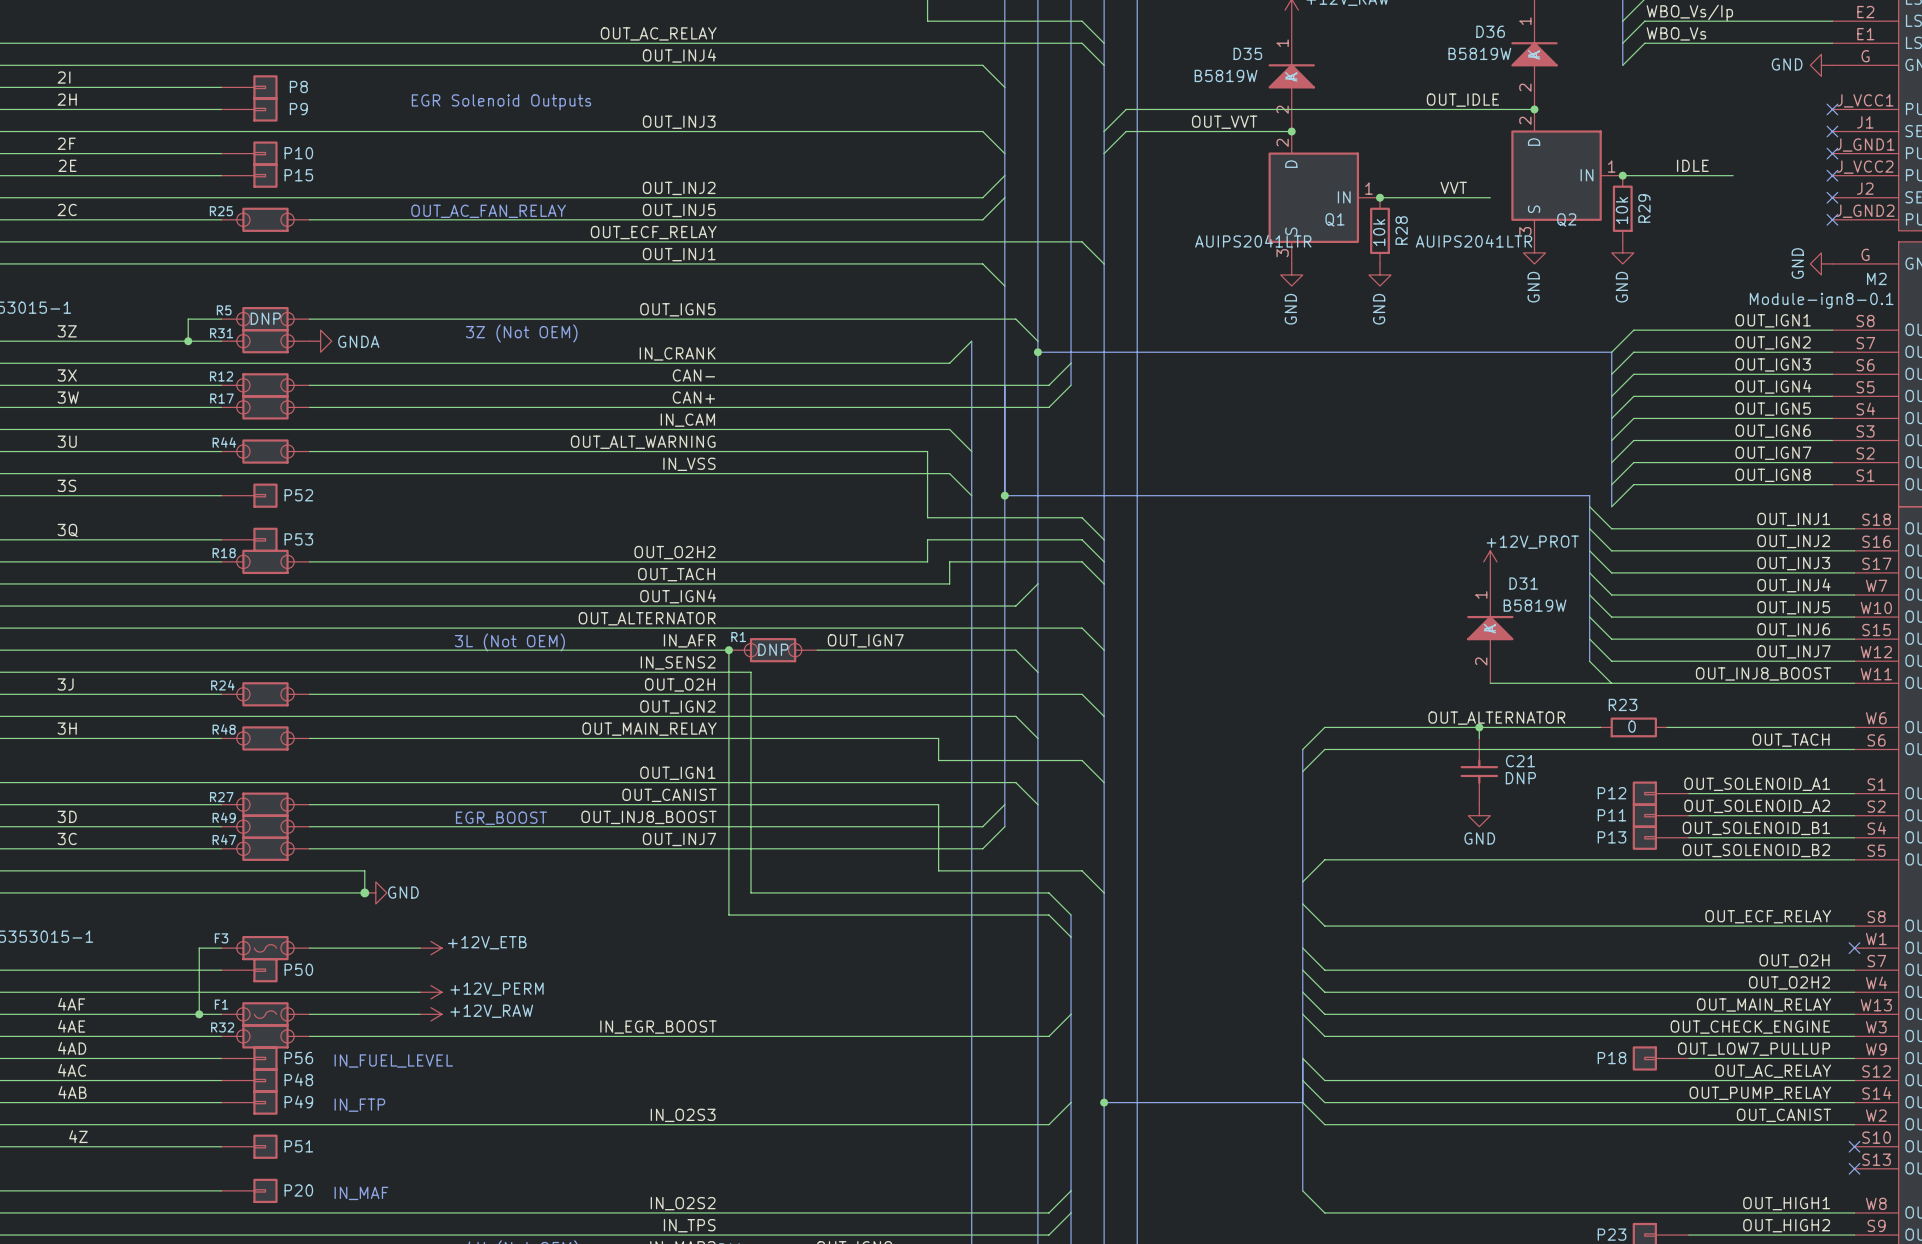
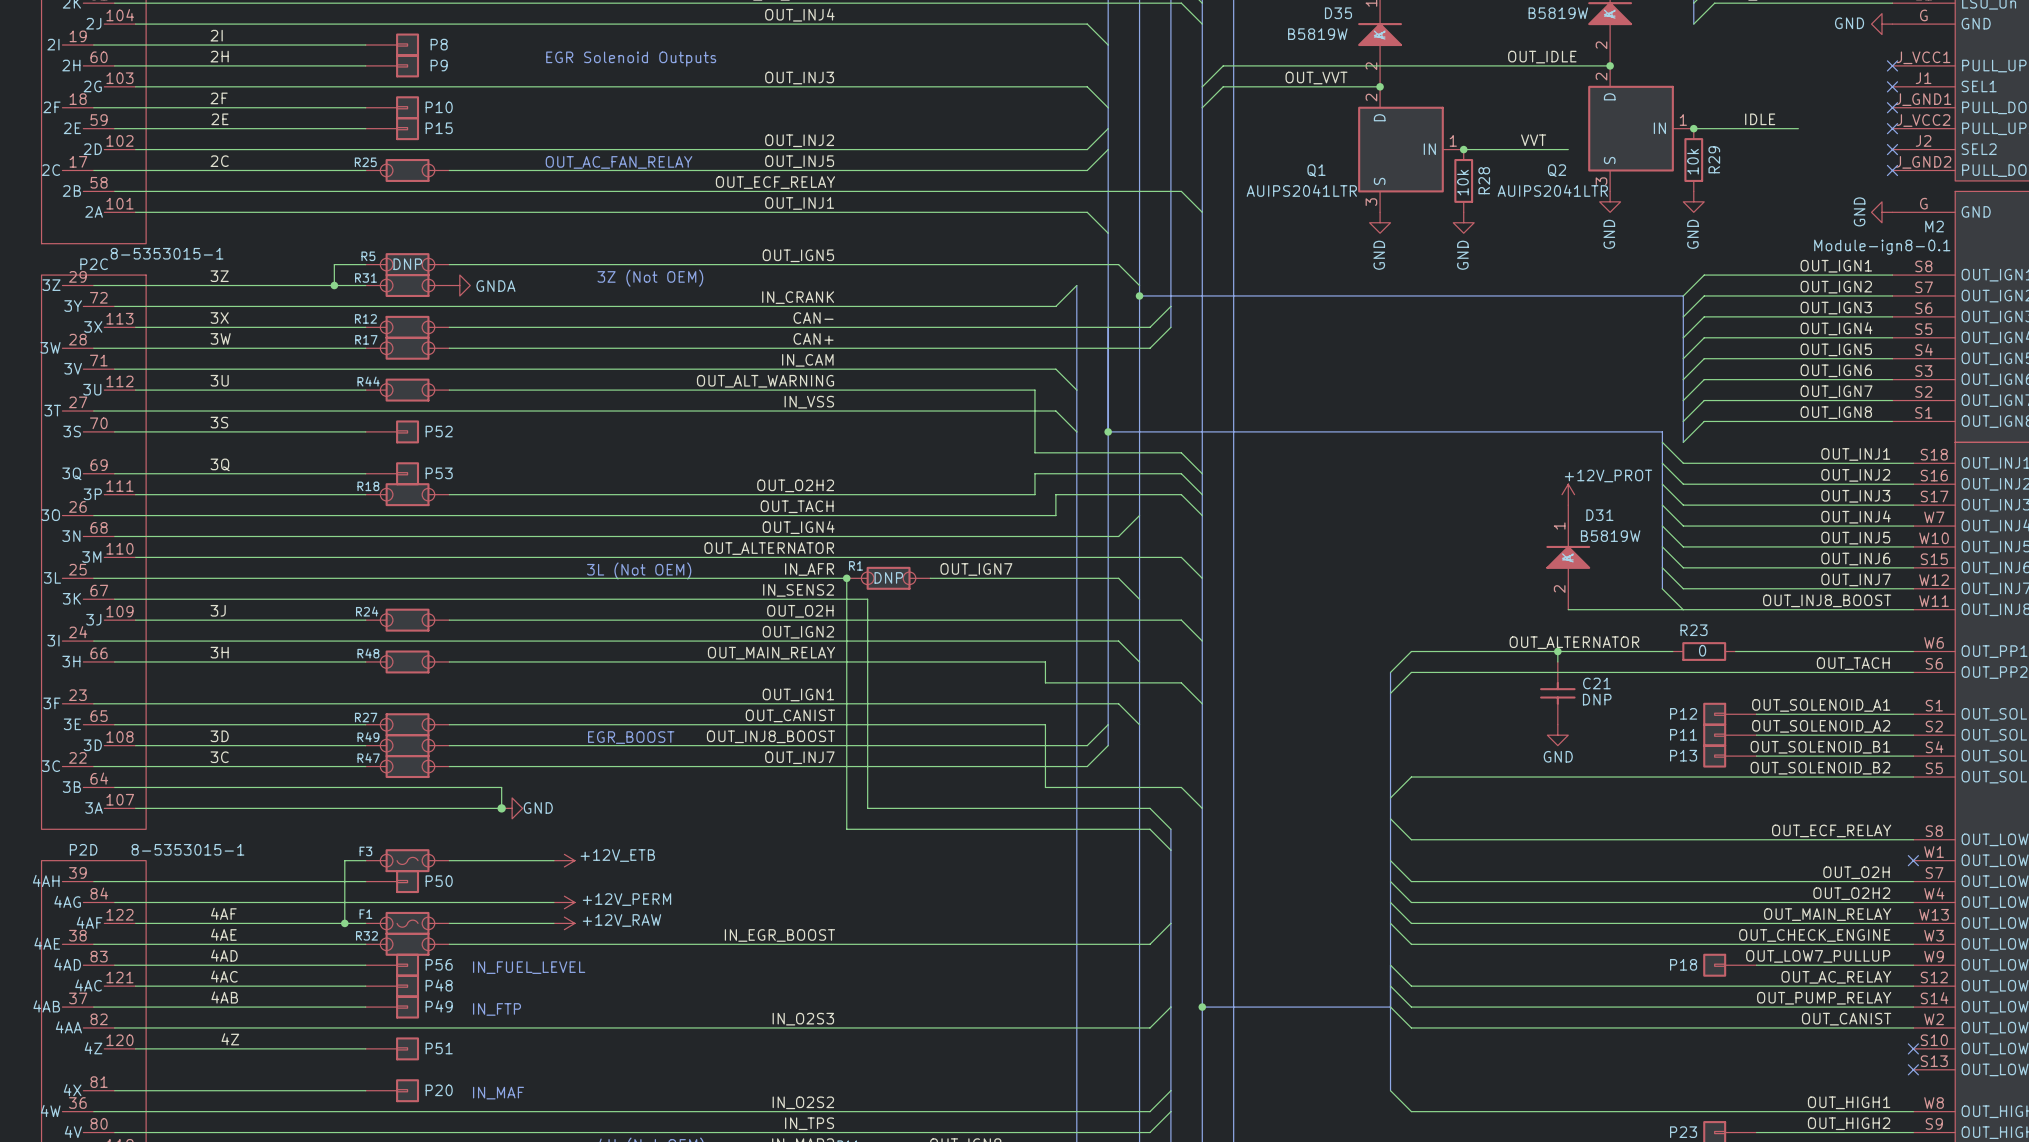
Q1 name position: Q1 (1334, 219) -> Q1 (1316, 170)
Q2 name position: Q2 (1566, 219) -> Q2 (1557, 170)
Q1 value position: AUIPS2041LTR (1253, 241) -> AUIPS2041LTR (1301, 190)

